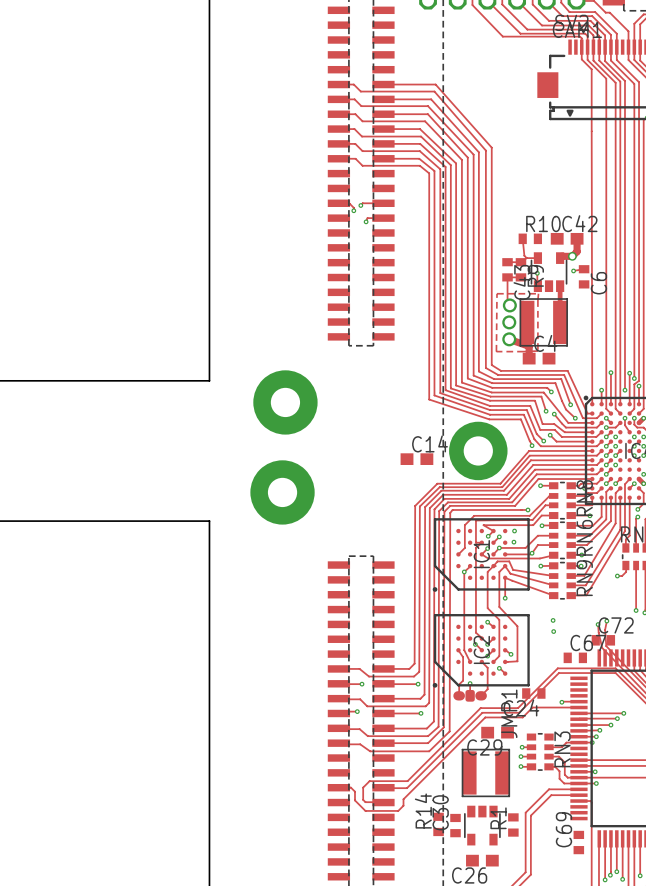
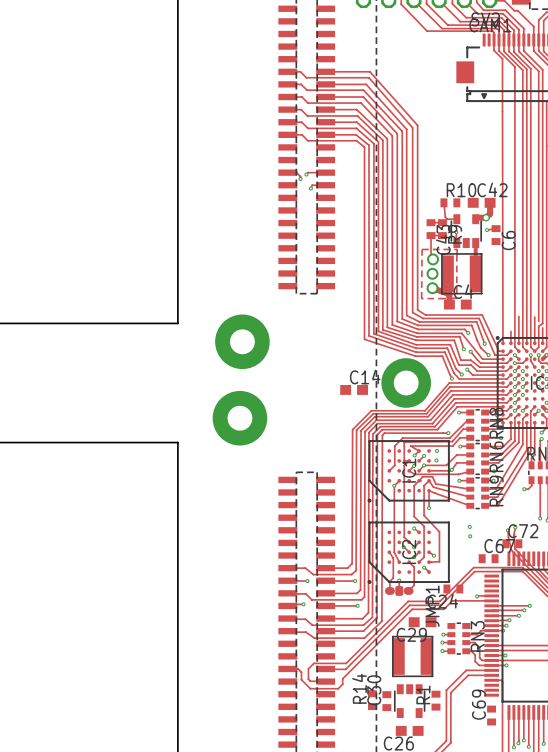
via: (610, 372) -> none
via: (629, 373) -> none
via: (634, 378) -> none
via: (639, 386) -> none
via: (601, 390) -> none
track: none -> (530, 331) (530, 347) (534, 351)
via: (624, 390) -> none

